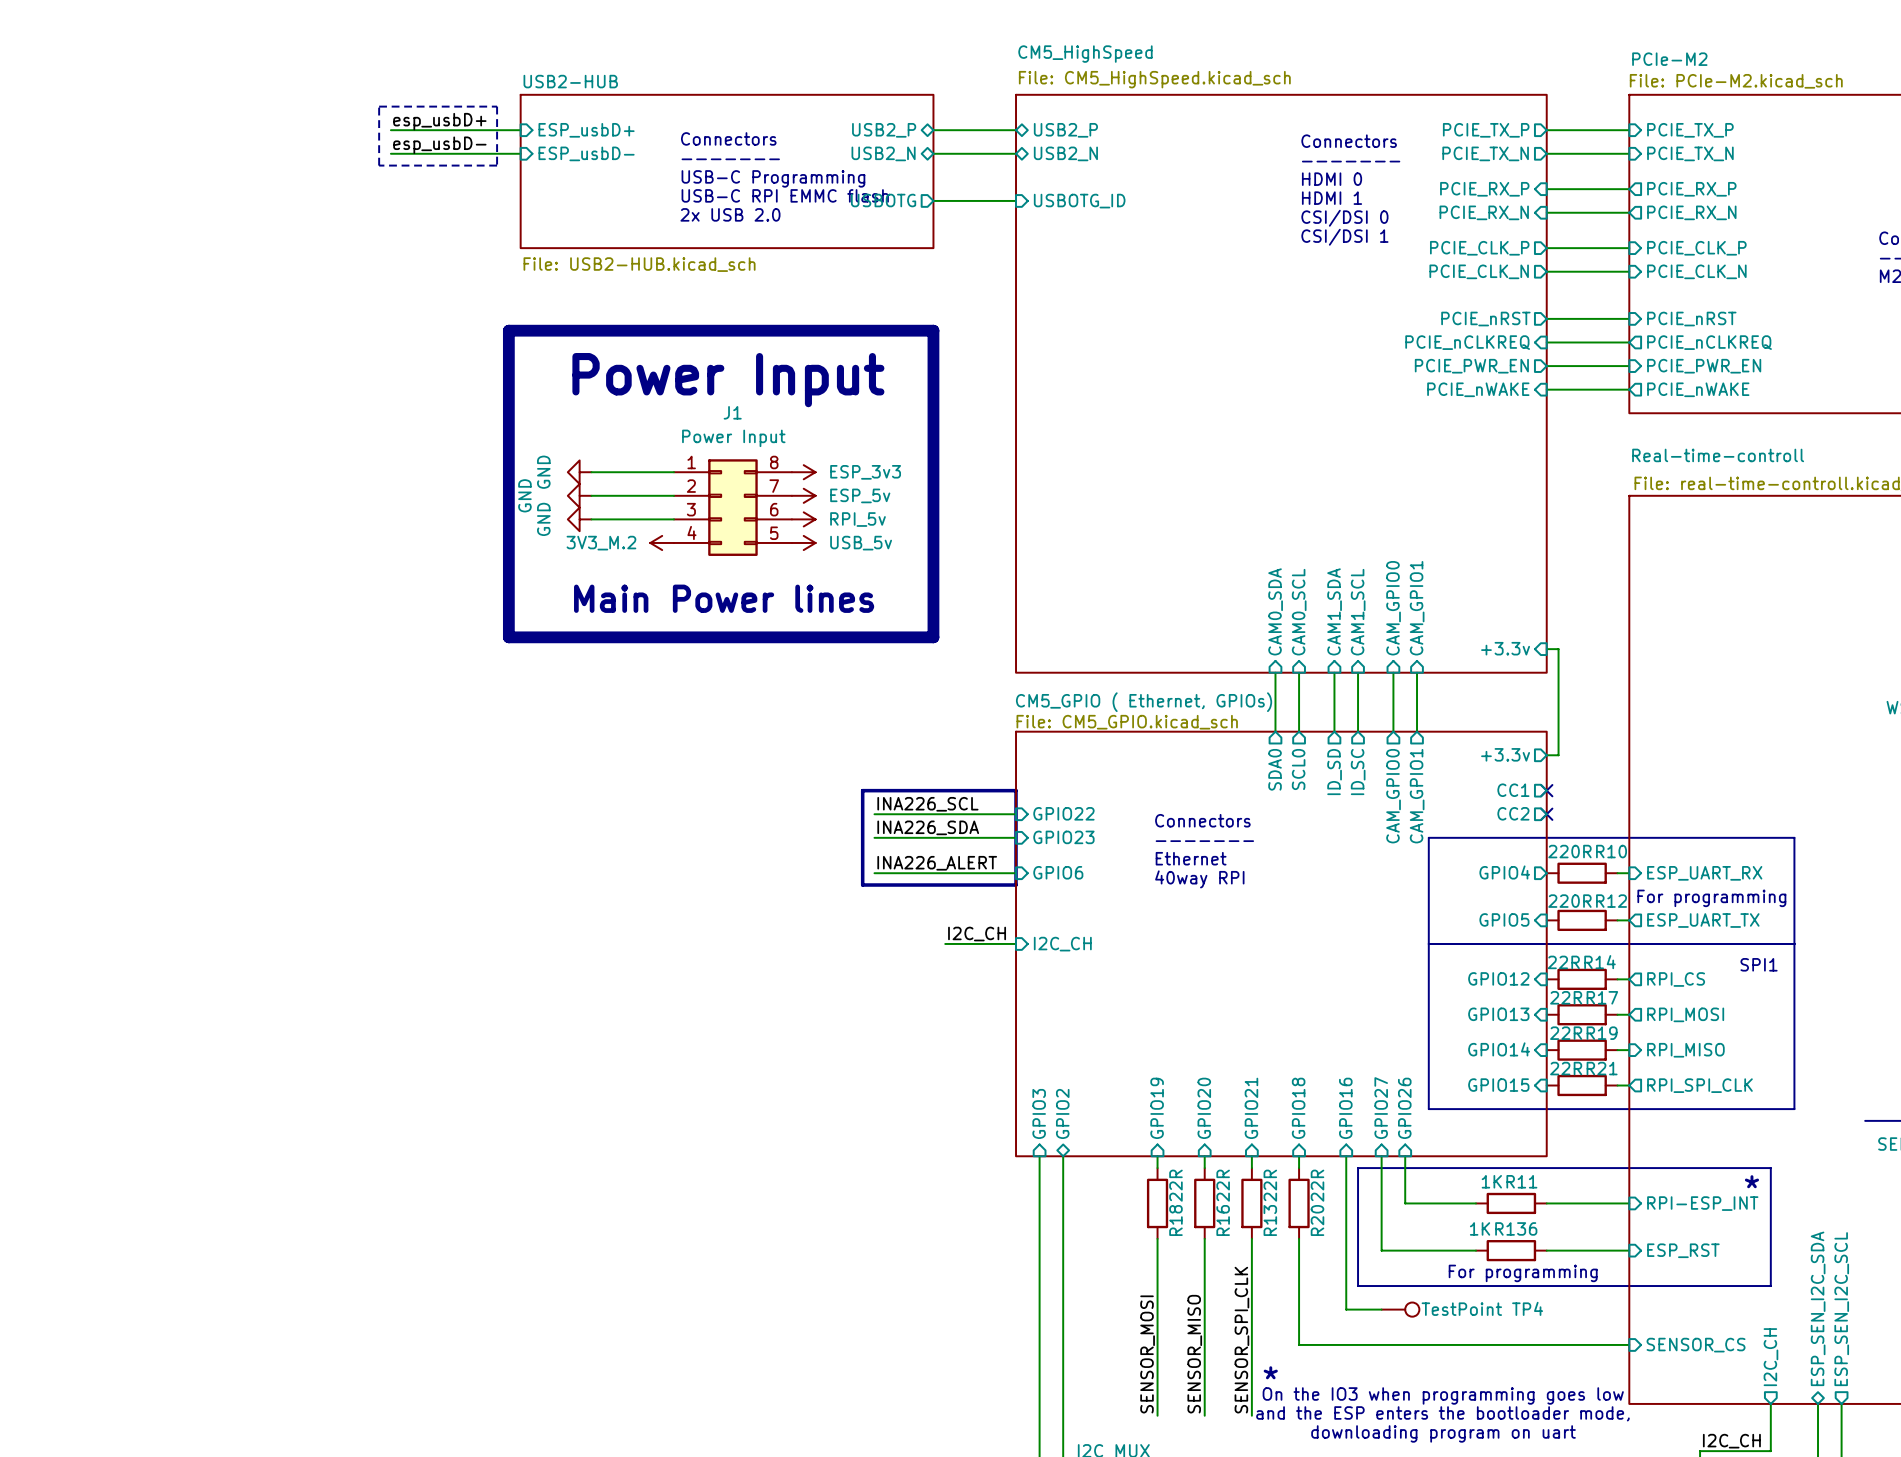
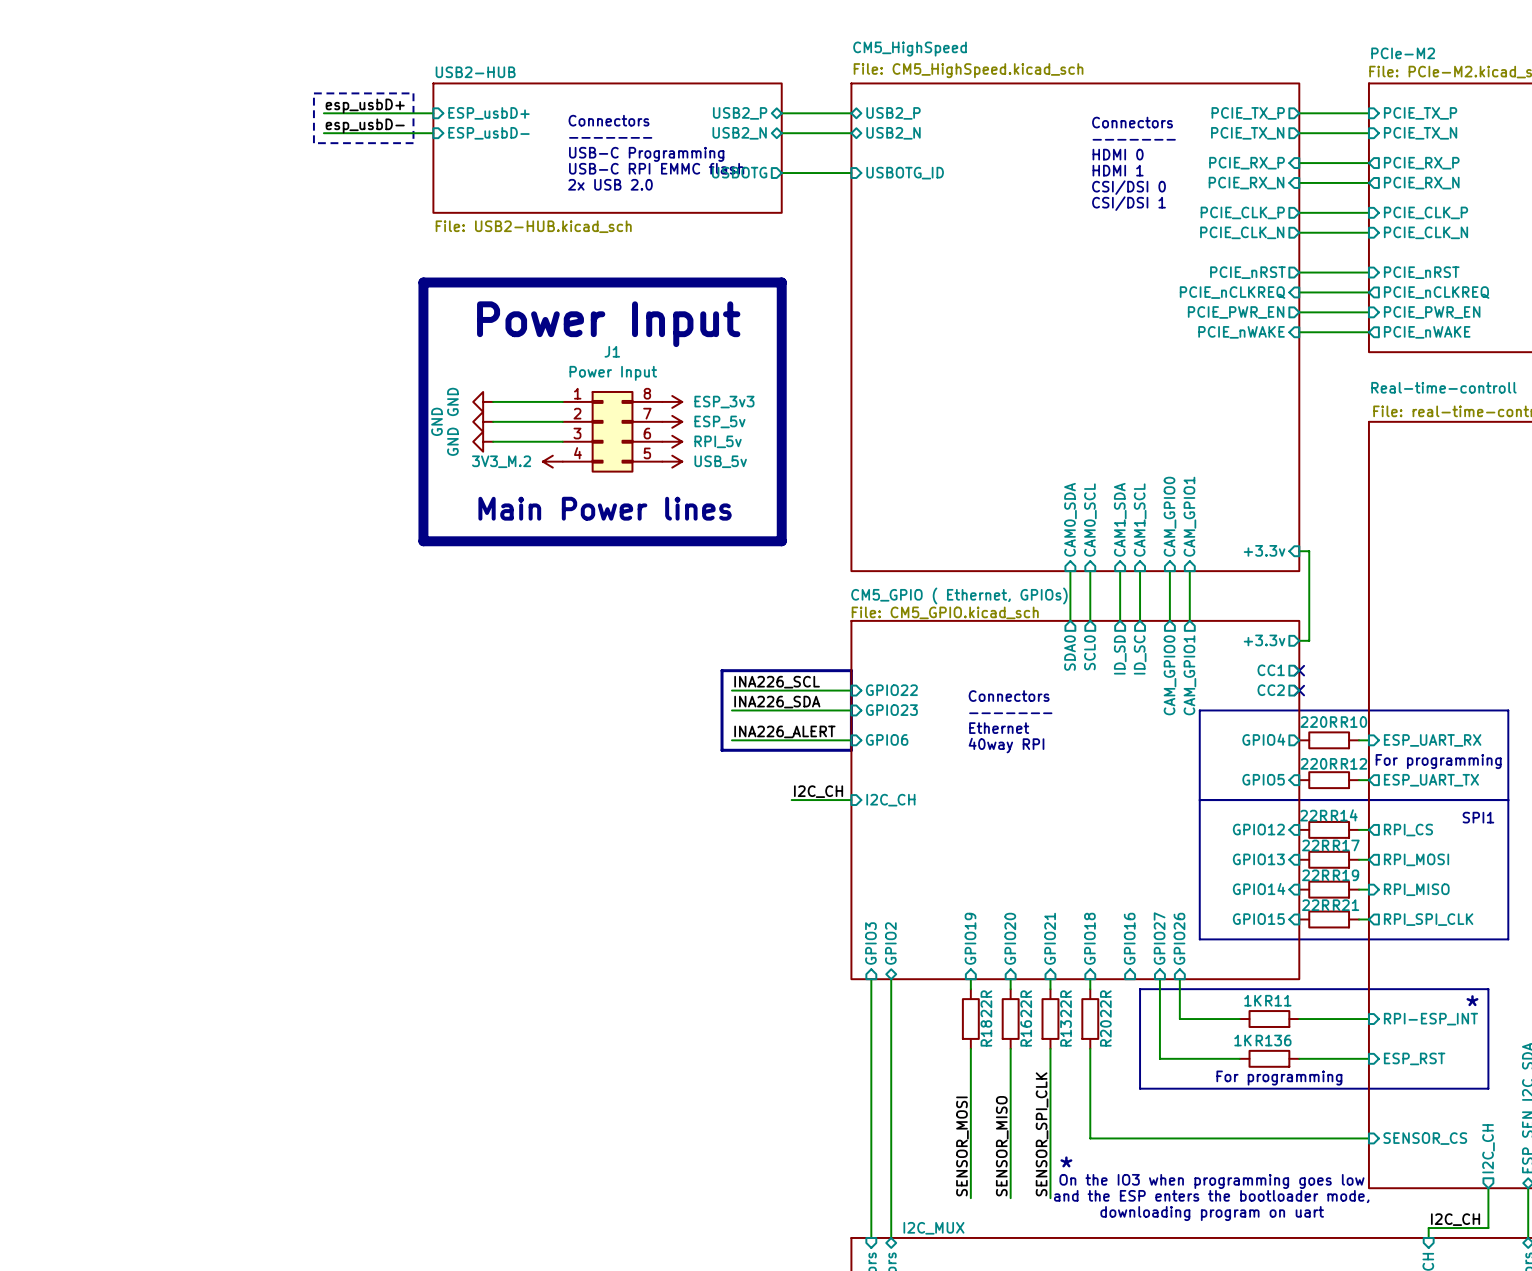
wire: (1346, 1156) (1346, 1309) (1381, 1309) -> none
TP4: TestPoint (1400, 1309) -> none

